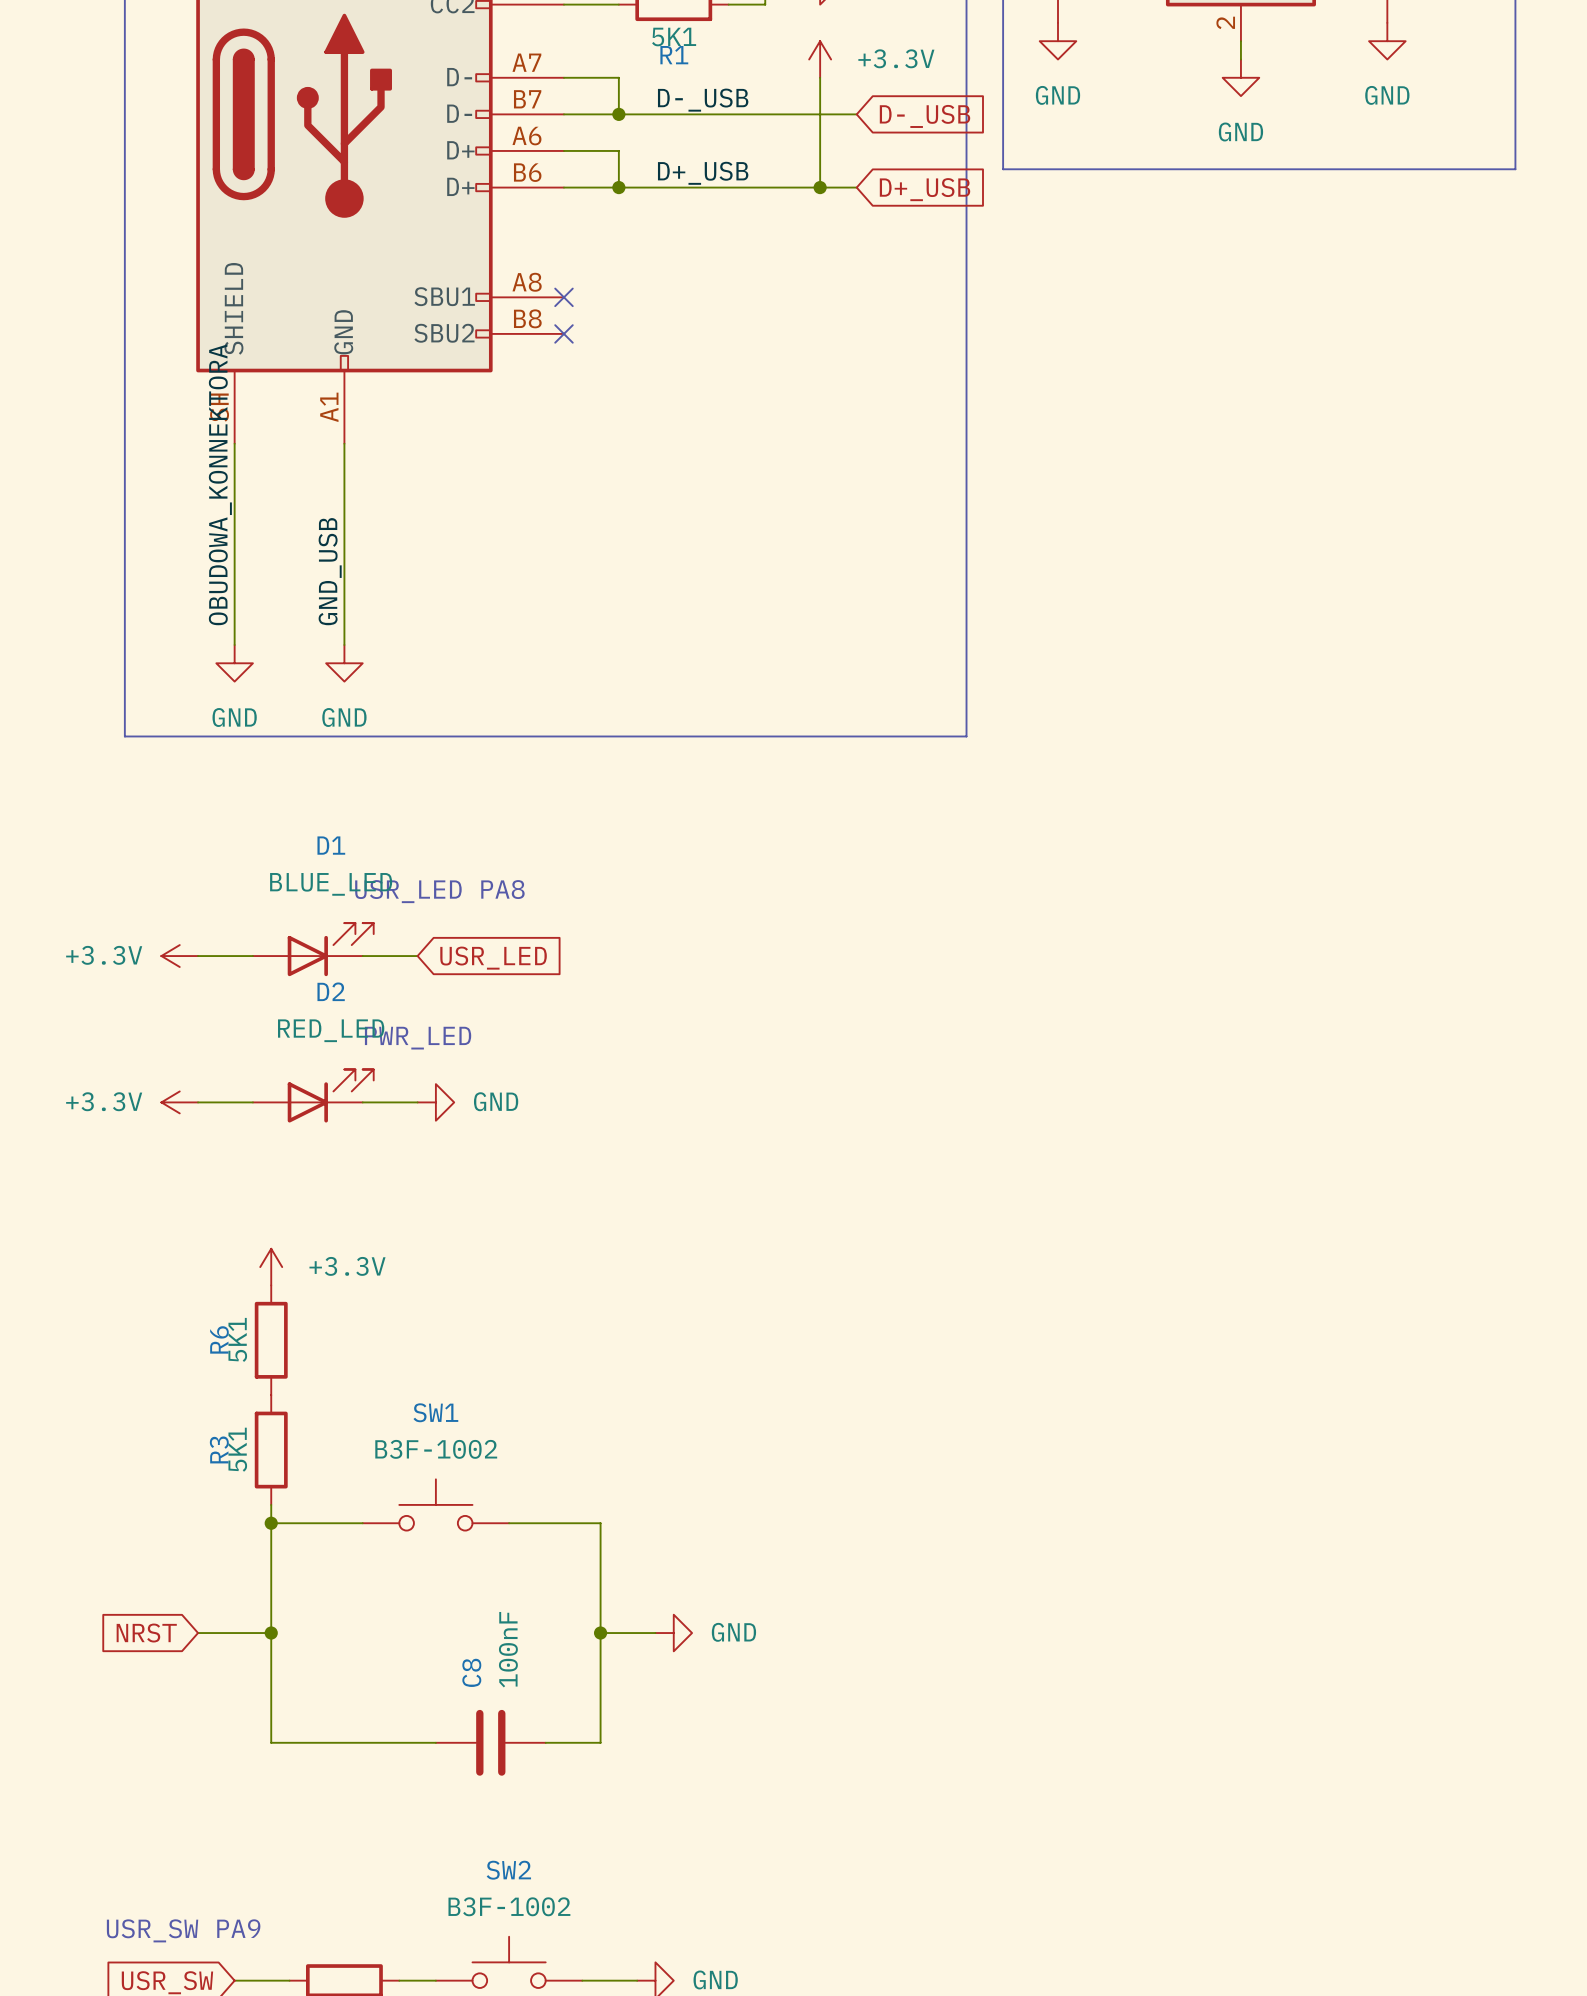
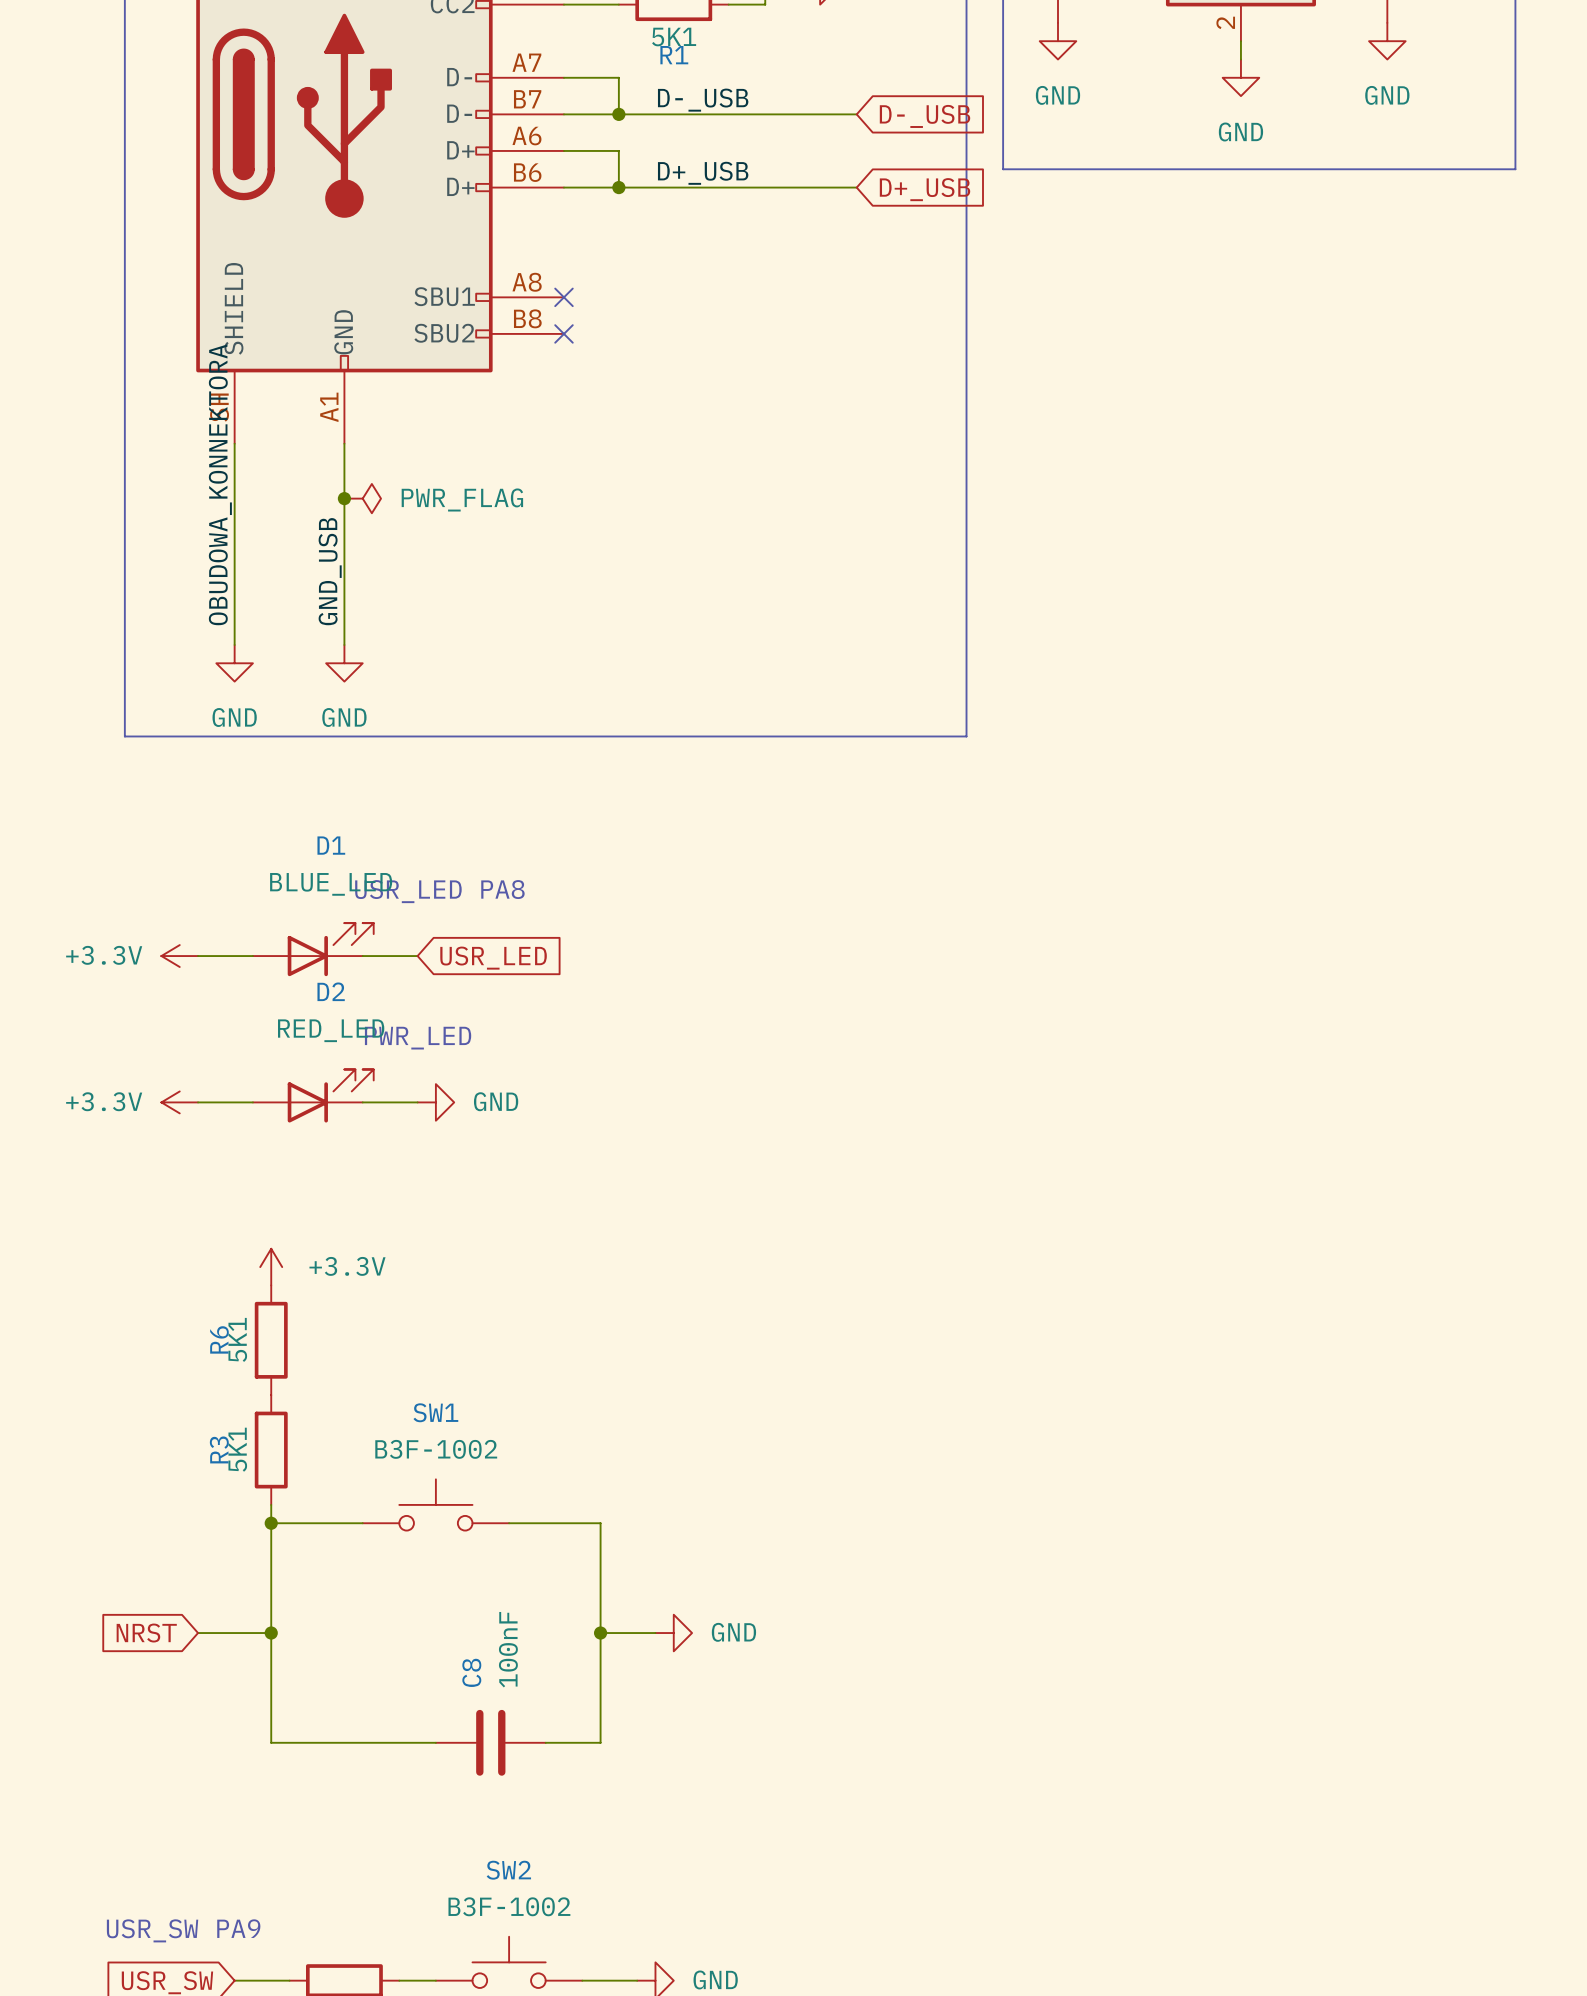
power symbol: +3.3V (820, 59) -> none
wire: (820, 77) (820, 187) -> none
junction: (820, 187) -> none
junction: none -> (344, 498)
power symbol: none -> PWR_FLAG (362, 498)

